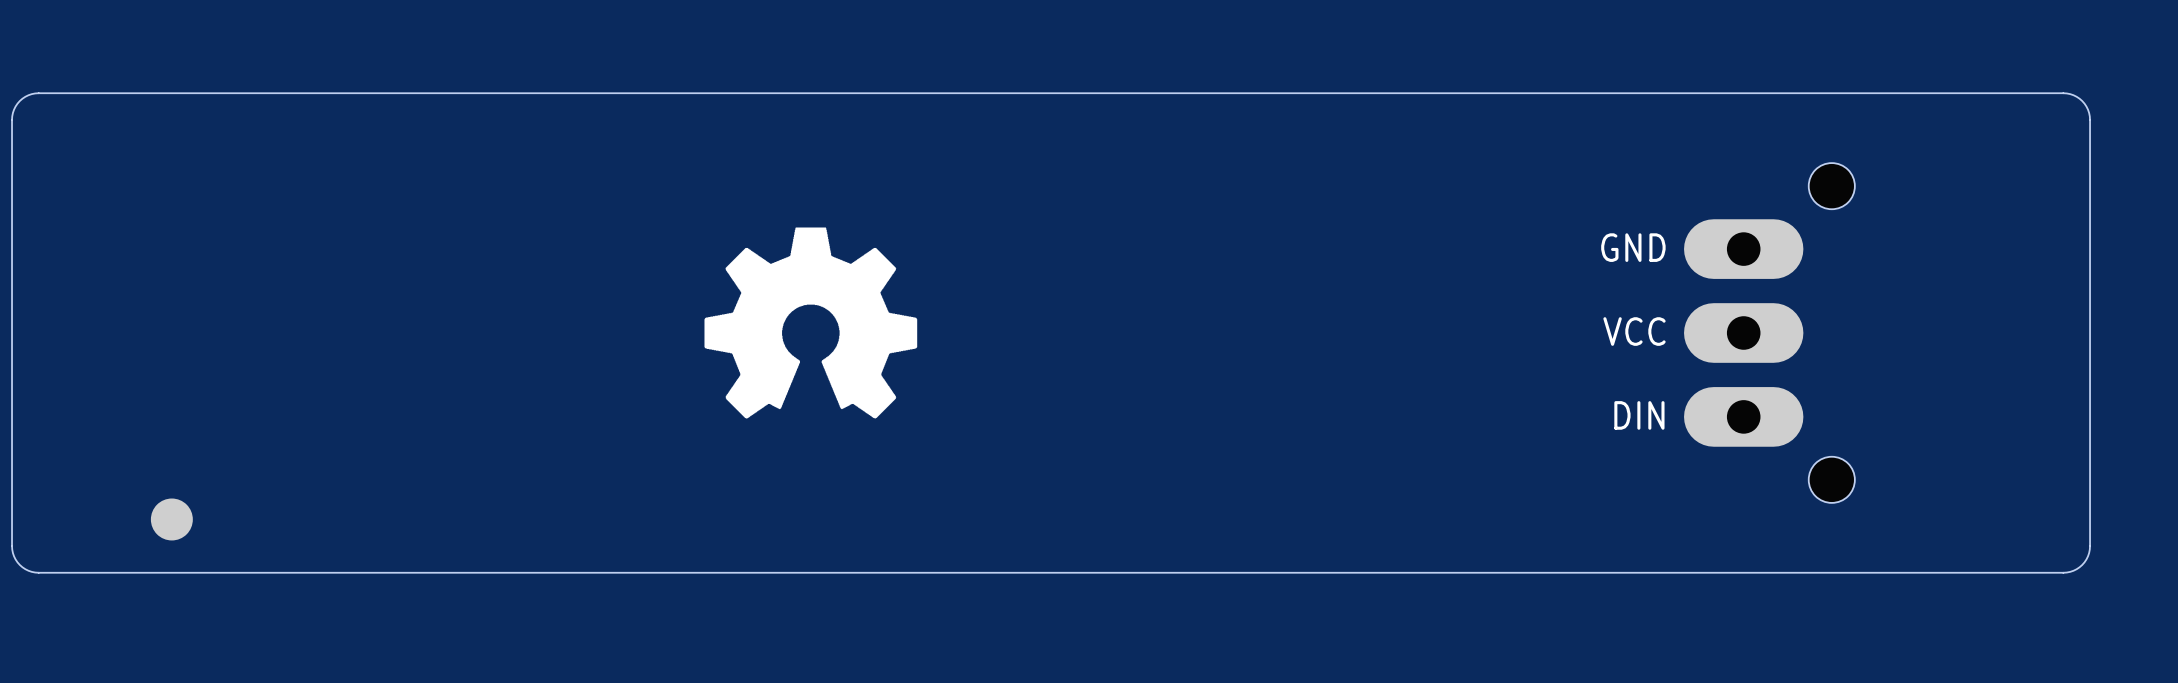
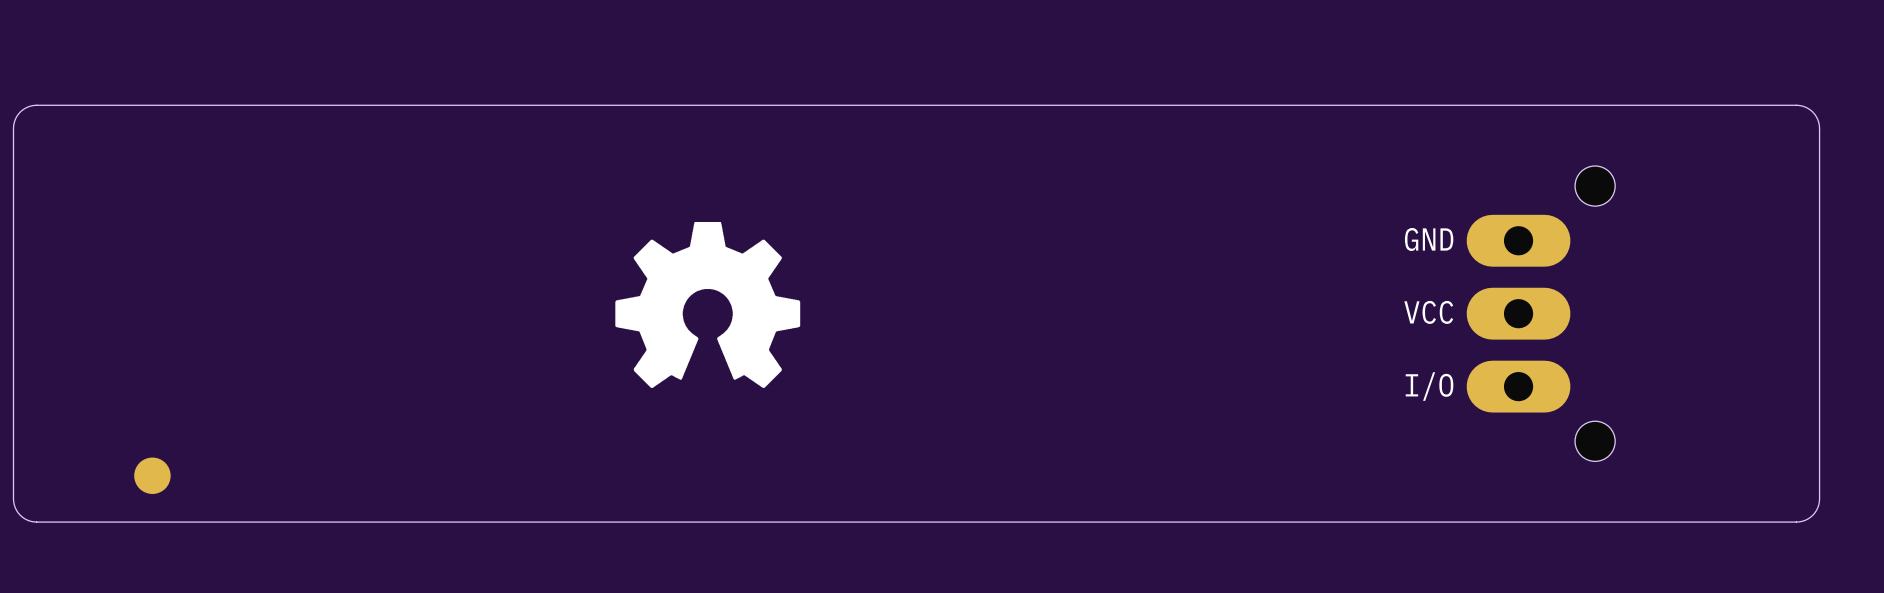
text: DIN (1639, 415) -> I/O (1429, 386)

